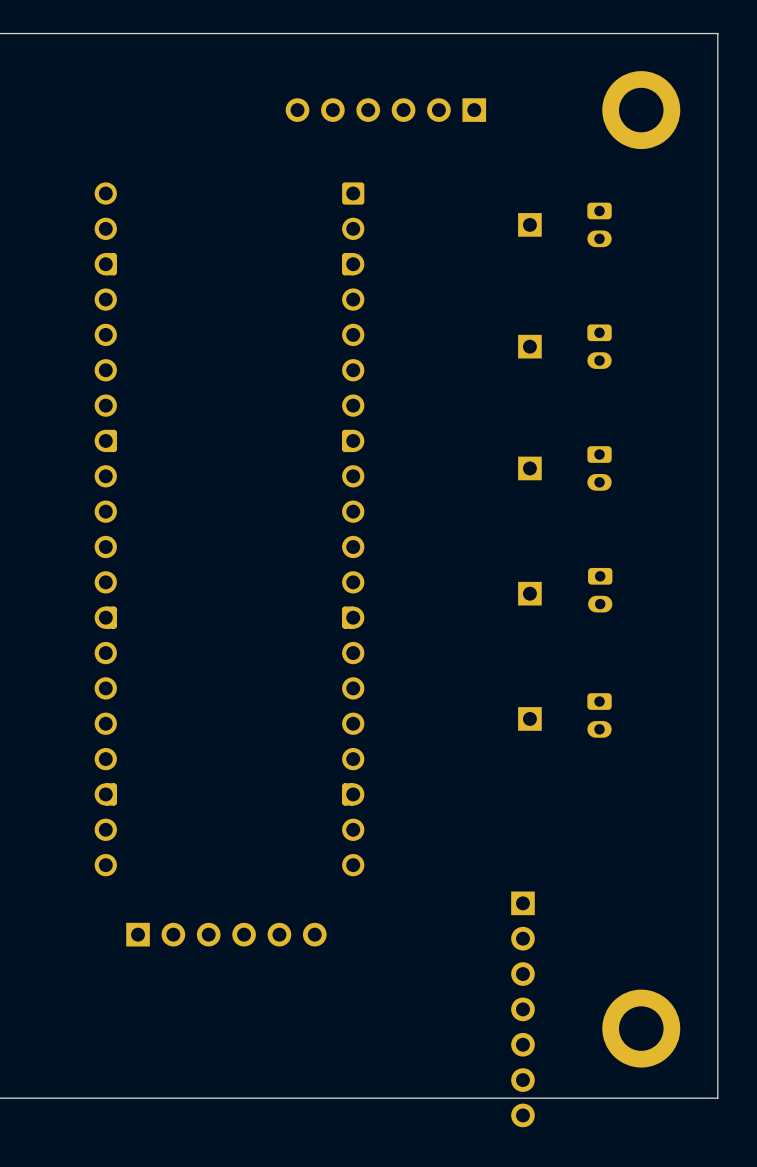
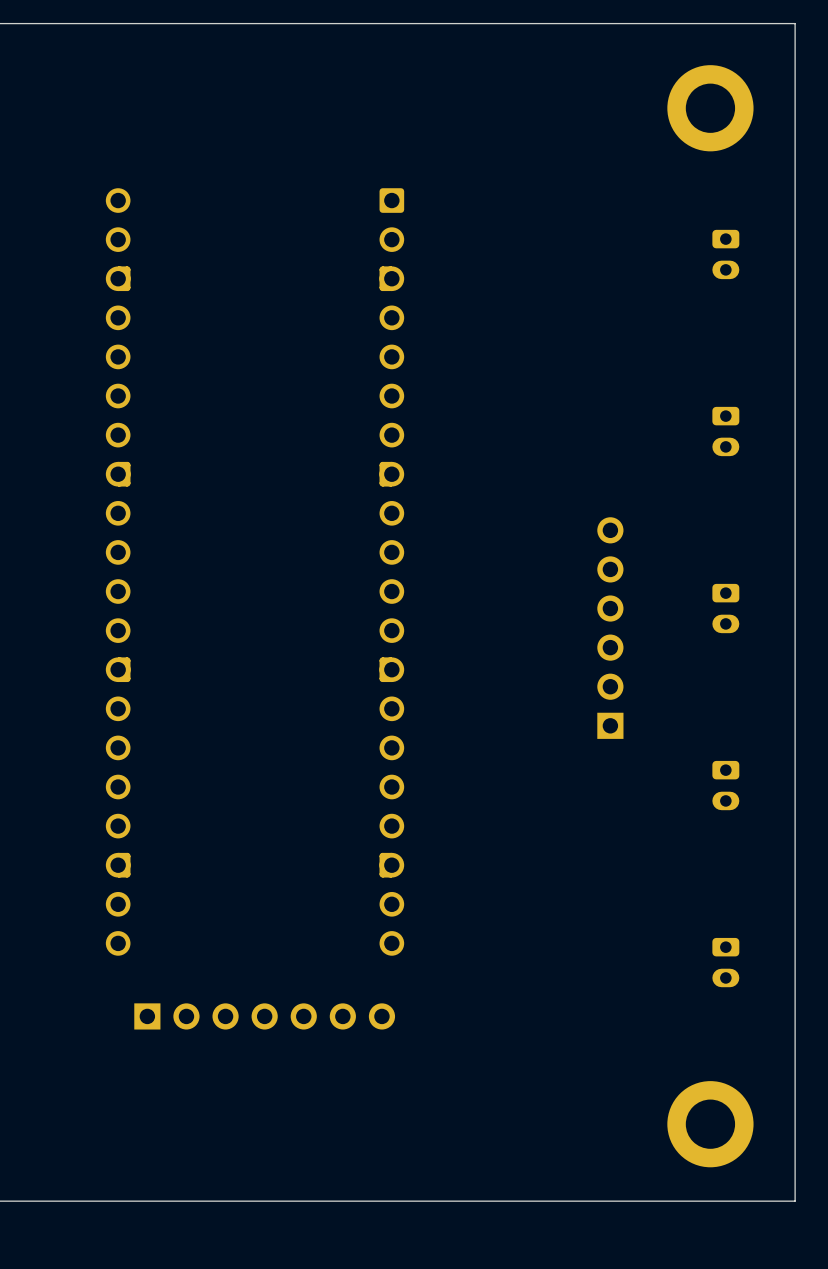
part: (385, 110) -> none
part: (529, 224) -> none
part position: (599, 224) -> (725, 254)
part: (529, 346) -> none
part: (599, 346) -> none
part: none -> (725, 431)
part: (529, 468) -> none
part: (599, 468) -> none
part: none -> (725, 608)
part: none -> (610, 628)
part: (600, 590) -> none
part: (529, 593) -> none
part position: (599, 715) -> (725, 785)
part: (529, 718) -> none
part: none -> (725, 962)
part footprint: [126, 922, 327, 947] -> [134, 1003, 396, 1030]
part: (522, 1009) -> none

